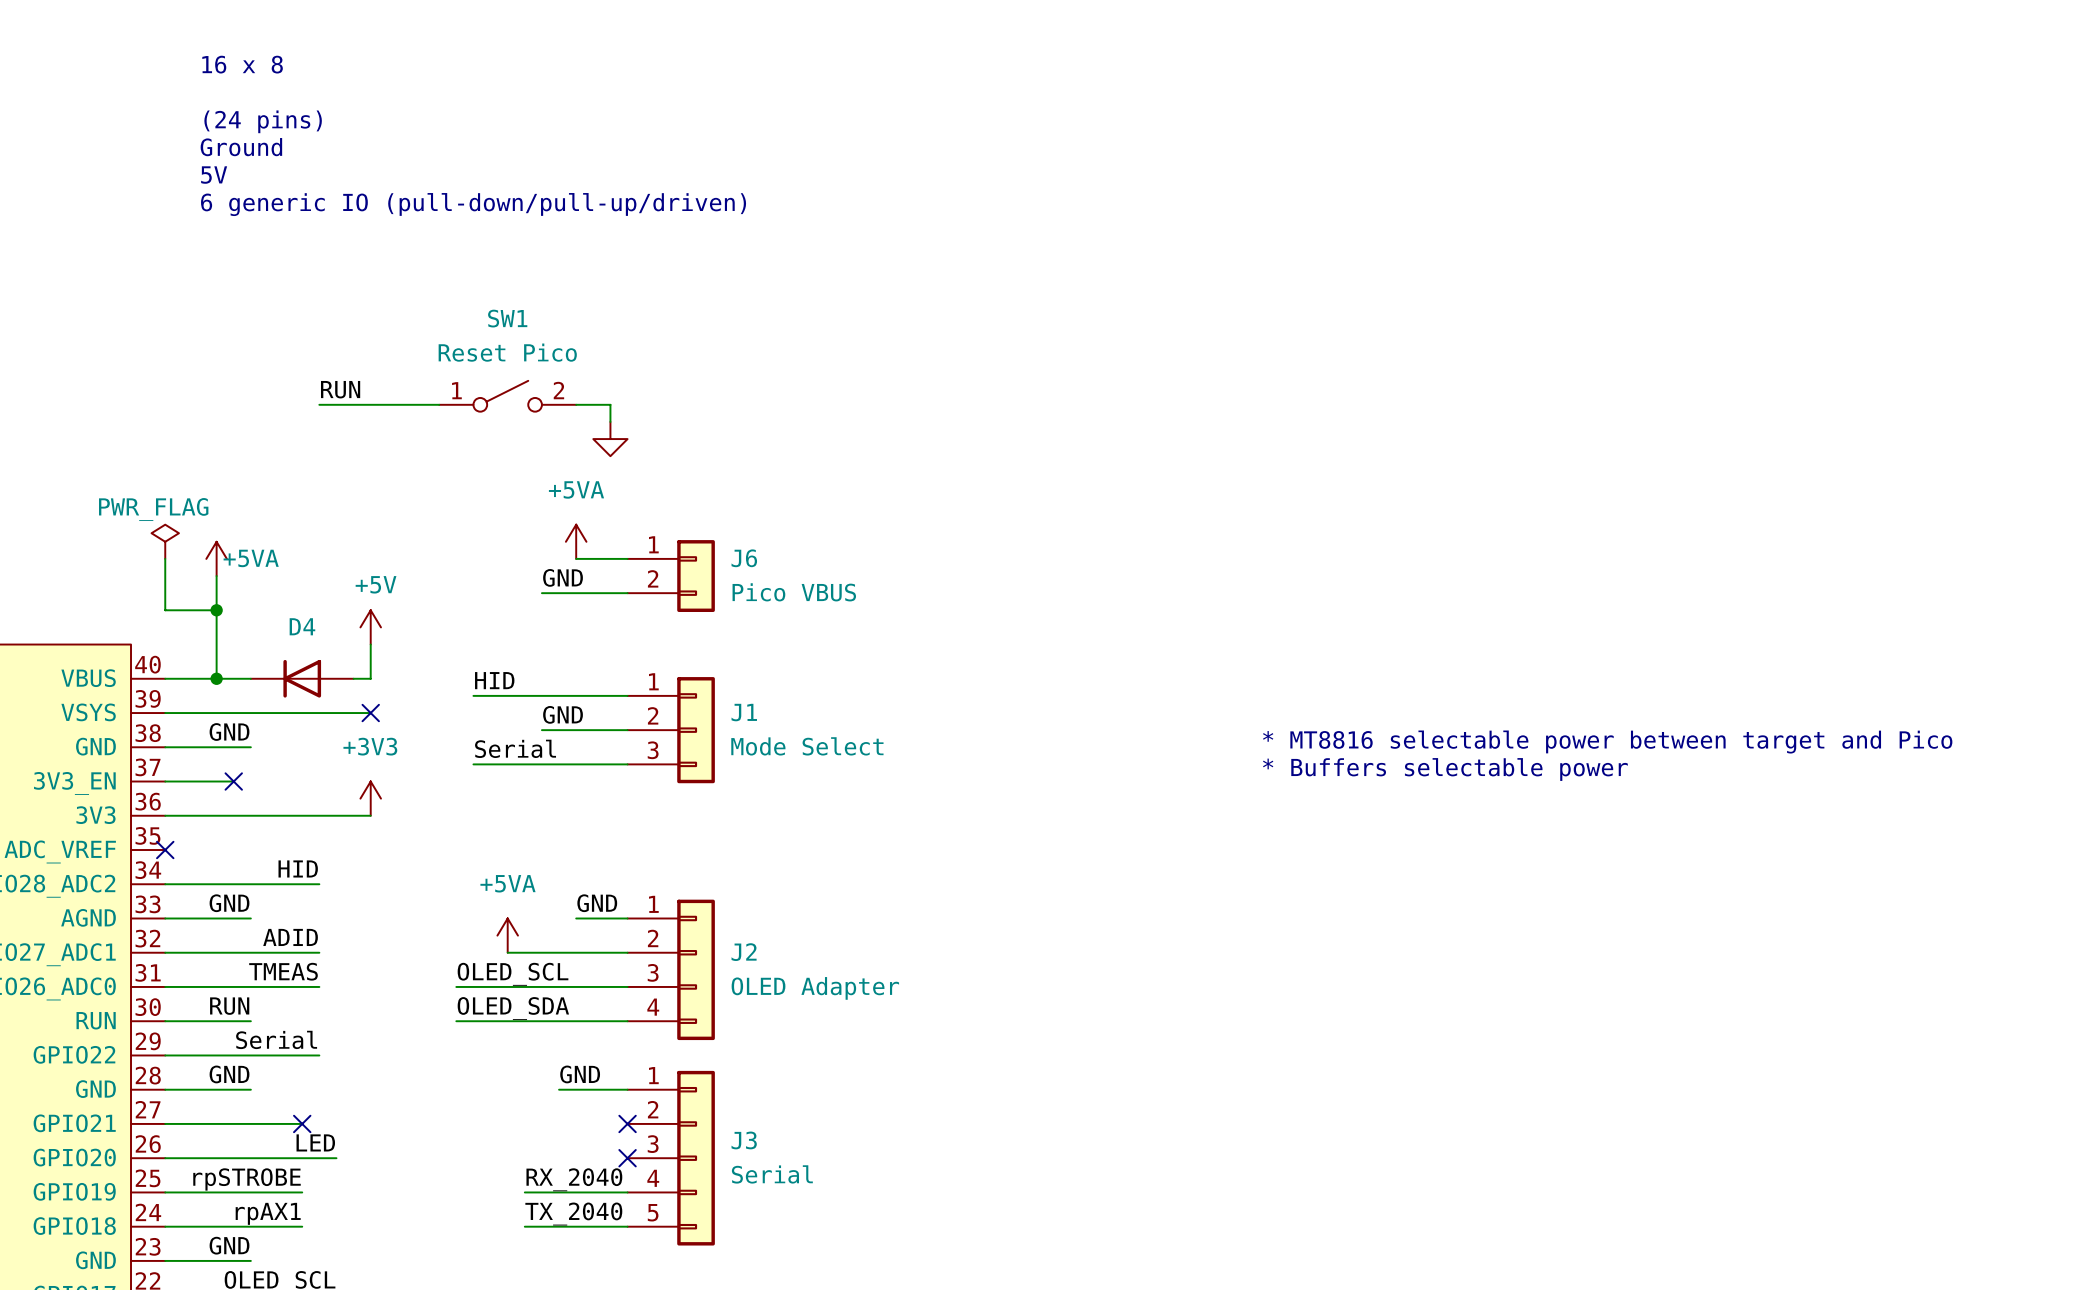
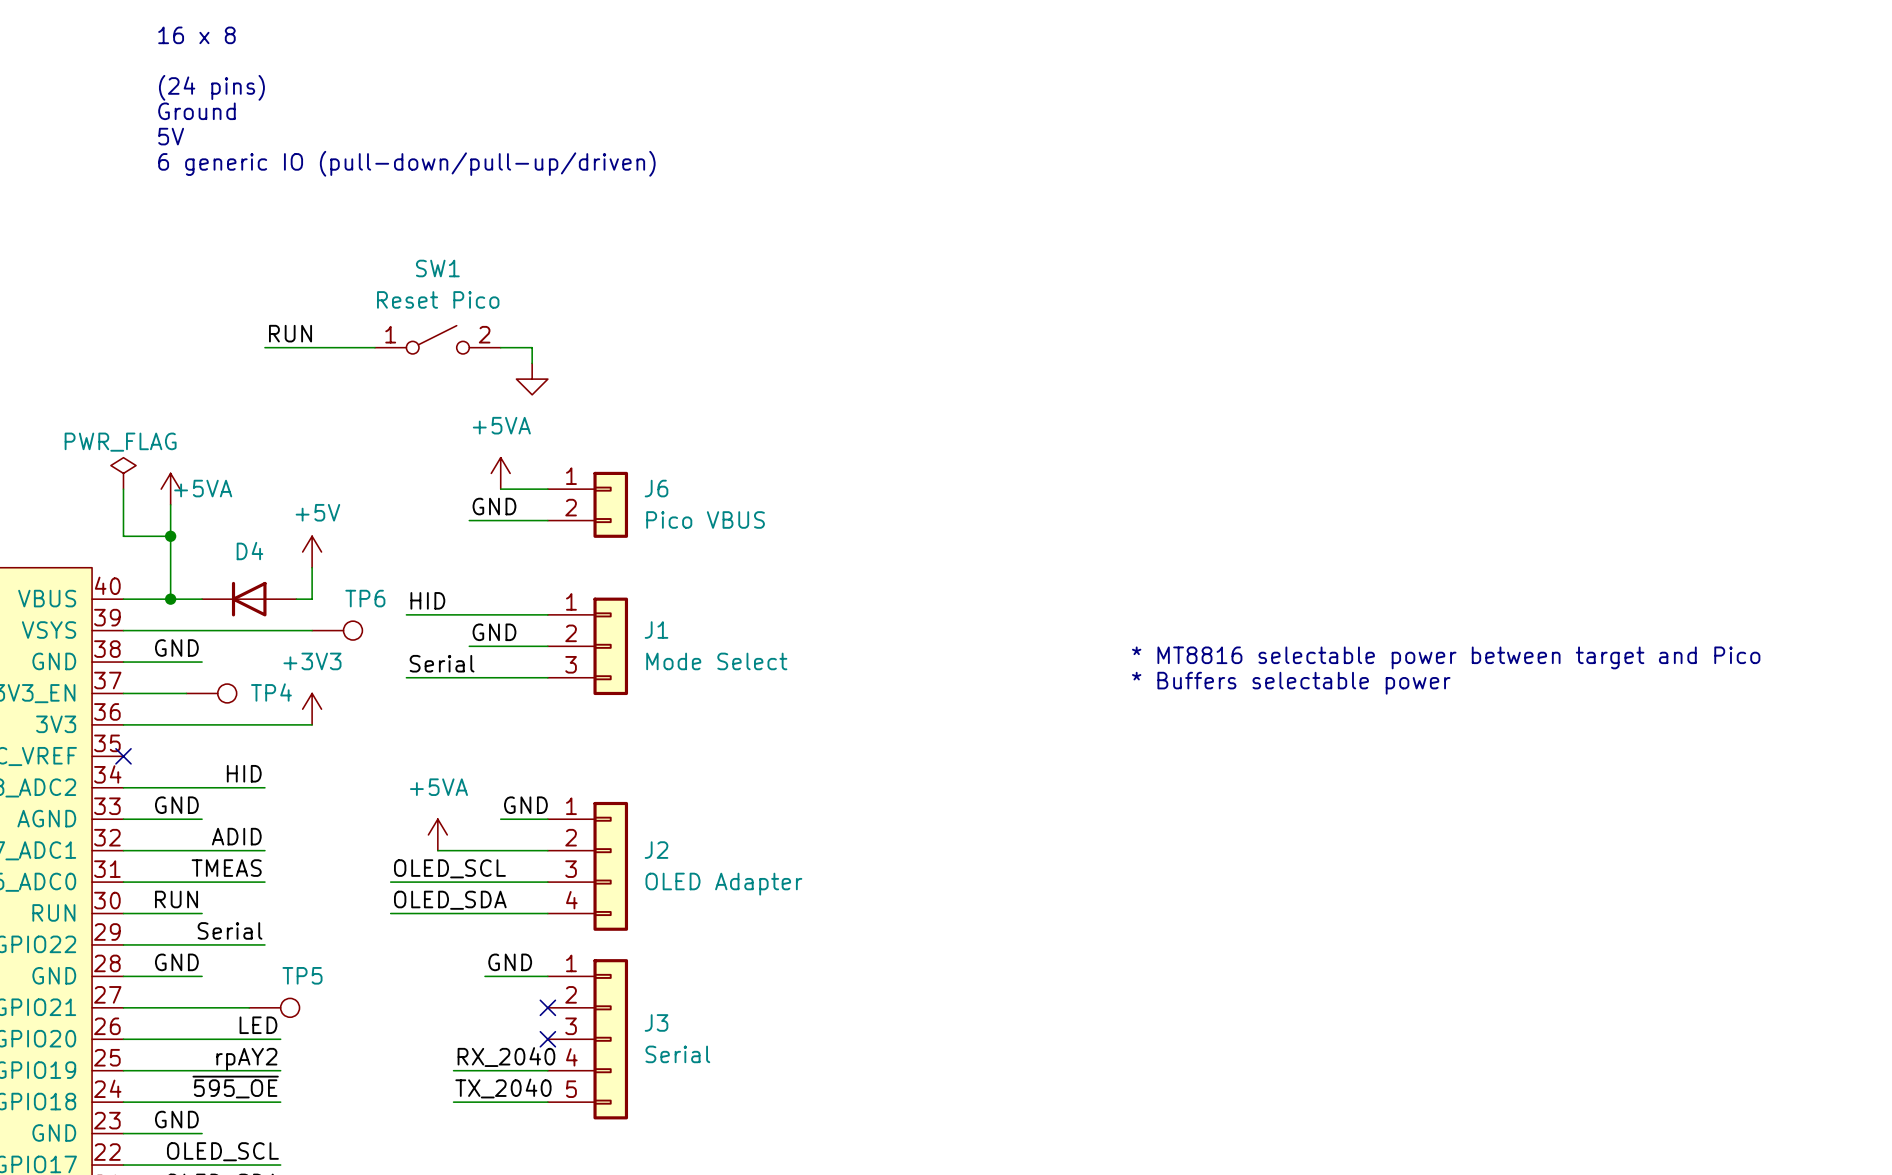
no-connect mark: (370, 713) -> none
TP6: none -> (337, 630)
no-connect mark: (233, 781) -> none
TP4: none -> (211, 693)
no-connect mark: (302, 1123) -> none
TP5: none -> (274, 1007)
label: rpSTROBE (247, 1179) -> none
label: none -> rpAY2 (246, 1059)
wire: none -> (249, 1070) (280, 1070)
label: none -> ~{595_OE} (235, 1087)
label: rpAX1 (268, 1213) -> none
wire: none -> (249, 1102) (280, 1102)

